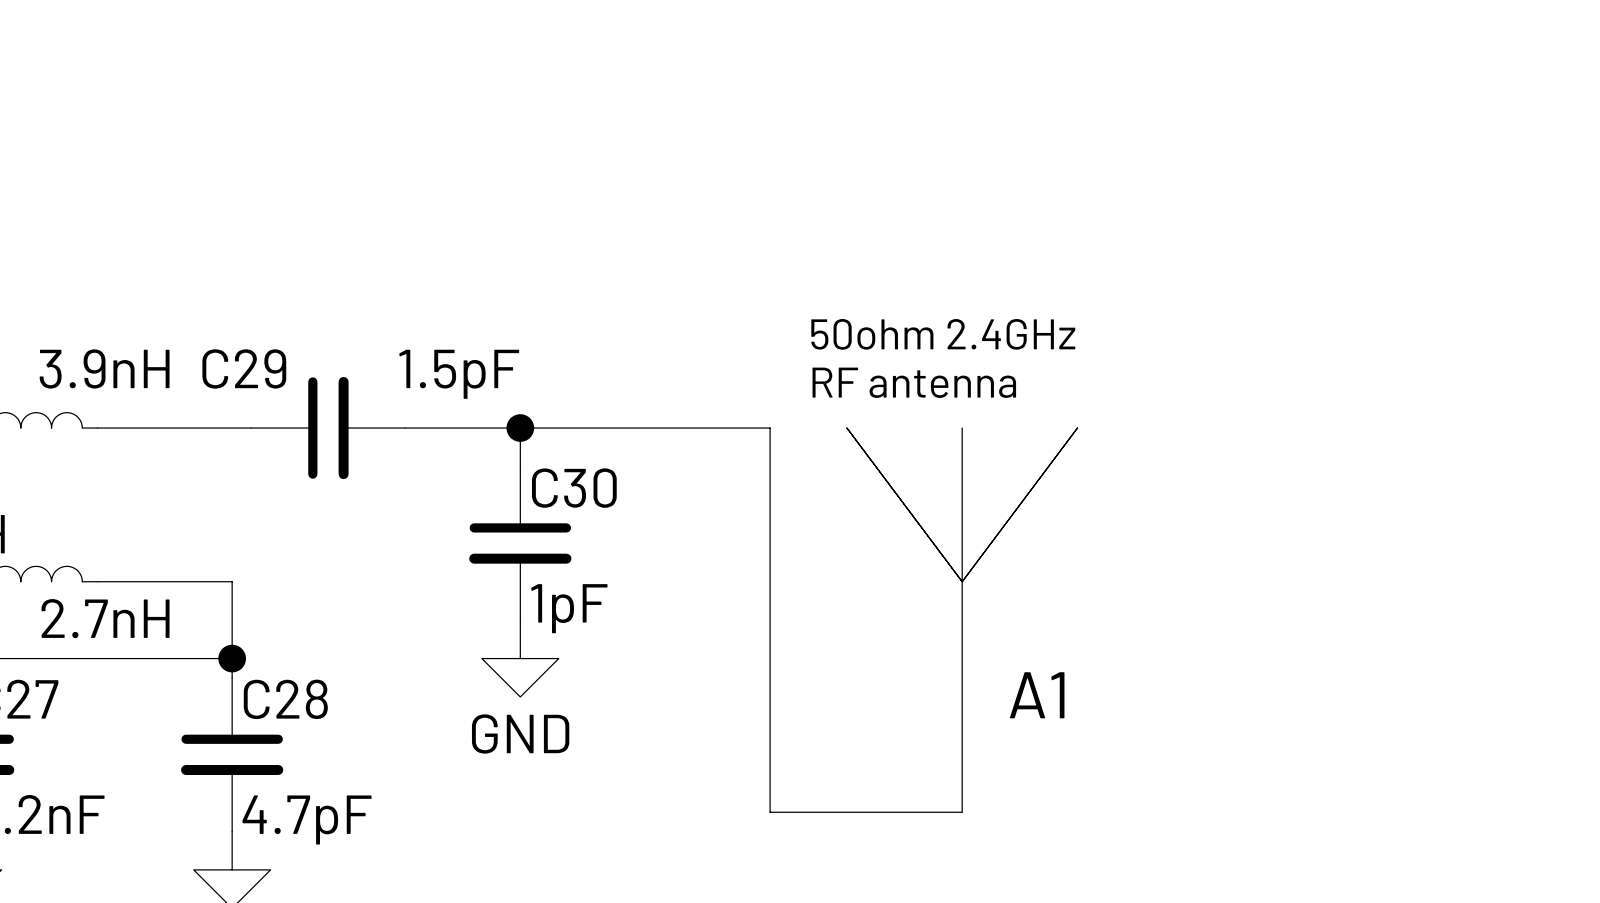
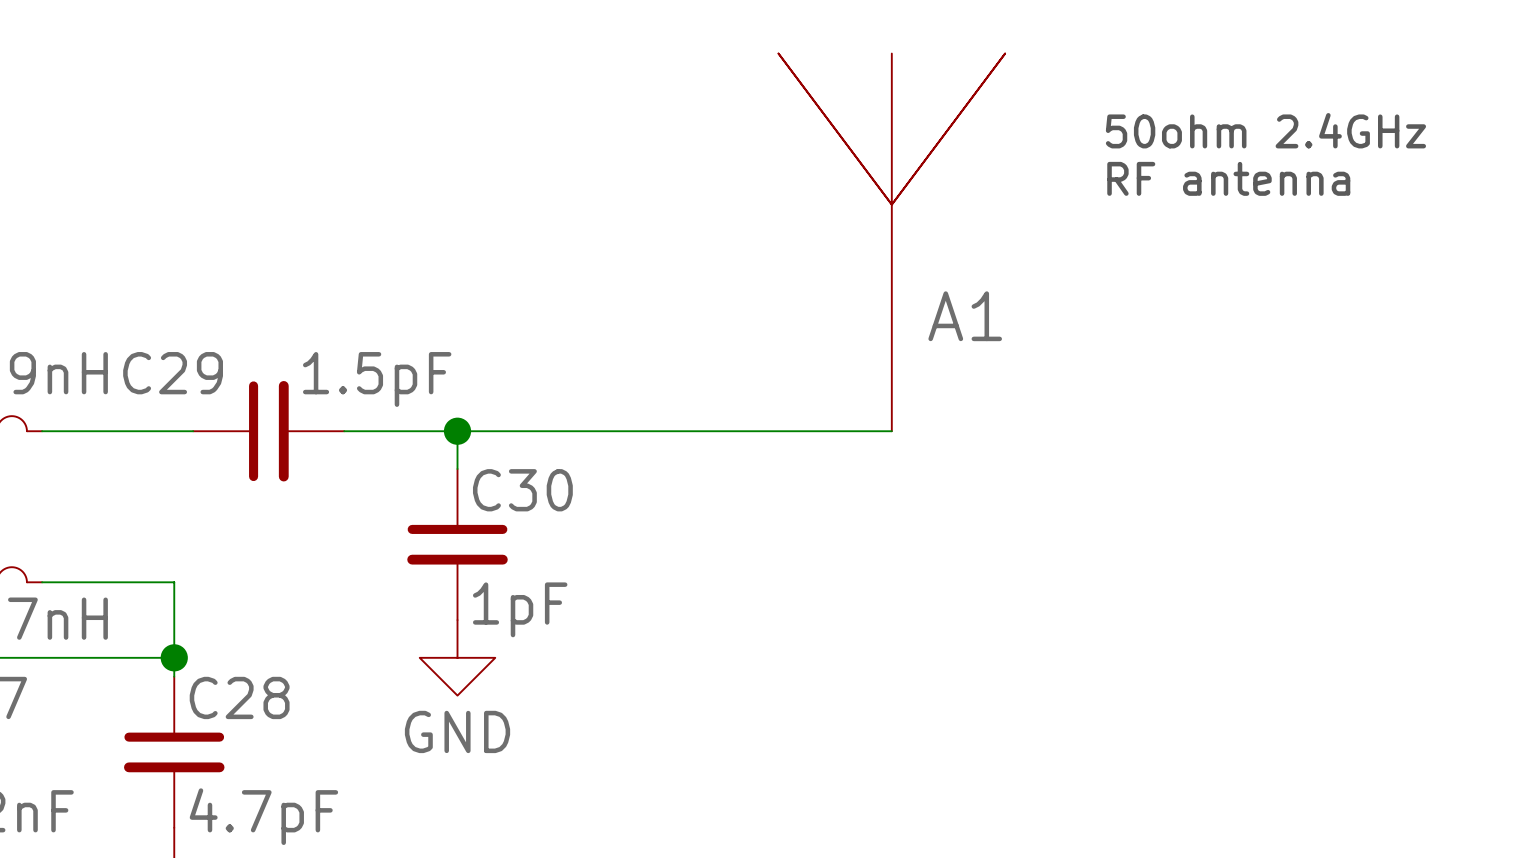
text position: 50ohm 2.4GHz (943, 334) -> 50ohm 2.4GHz (1265, 130)
text position: RF antenna (914, 382) -> RF antenna (1228, 178)
wire: (770, 428) (770, 812) (962, 812) -> (702, 431) (891, 431)
A1 position: (962, 620) -> (891, 242)

